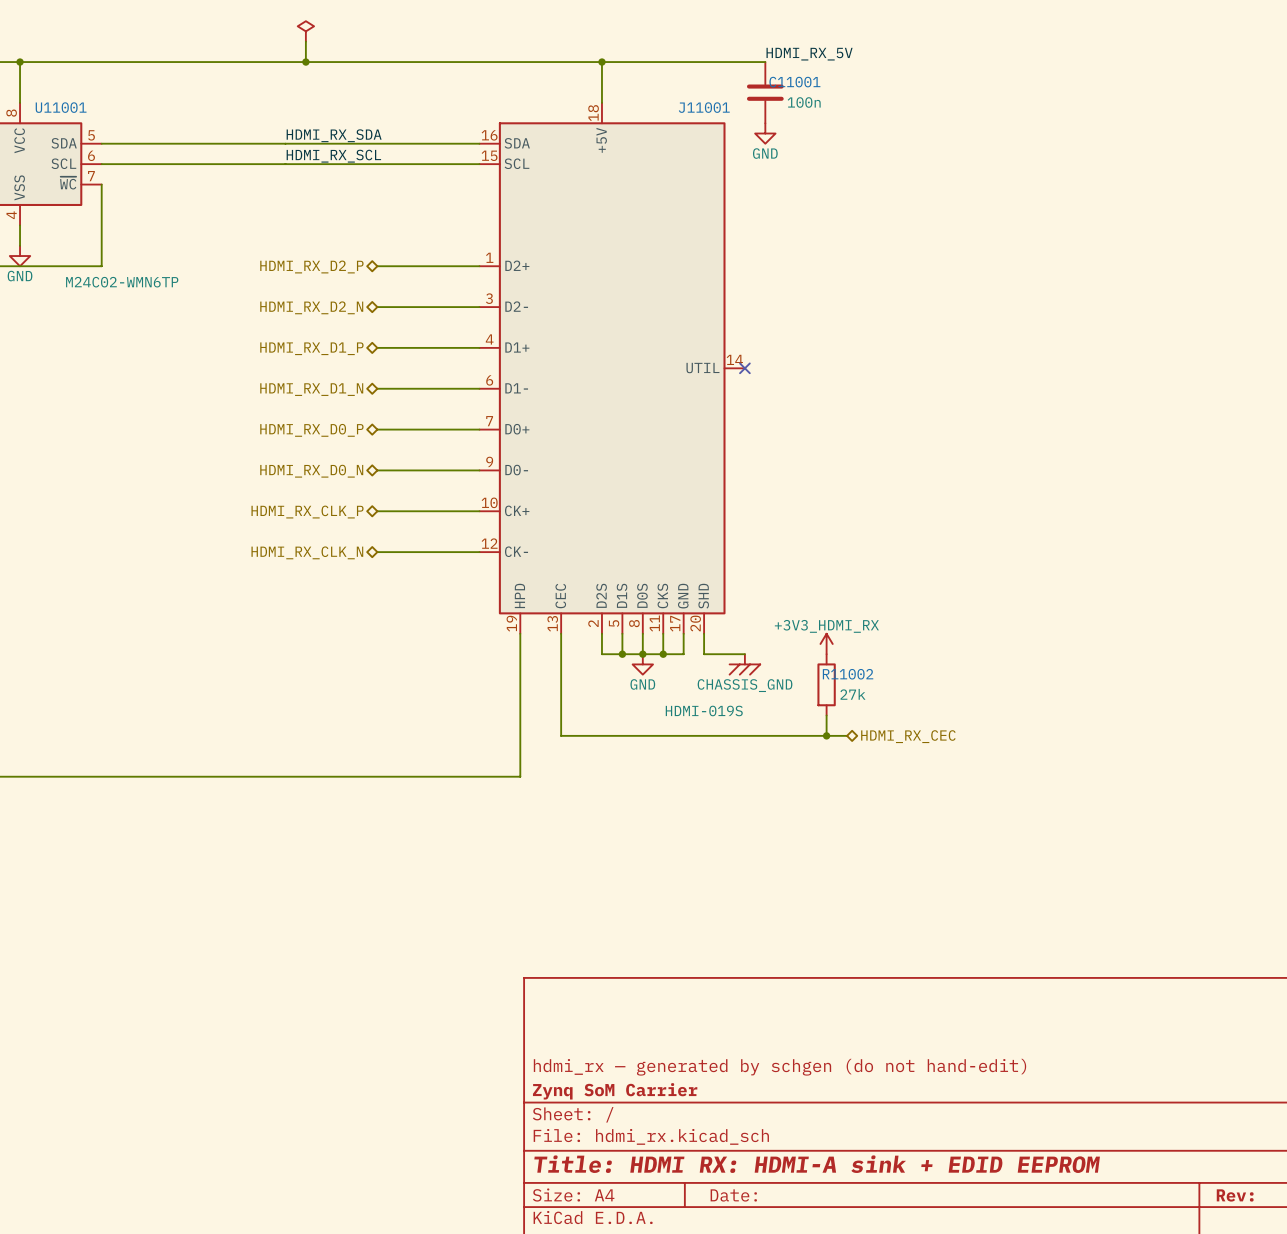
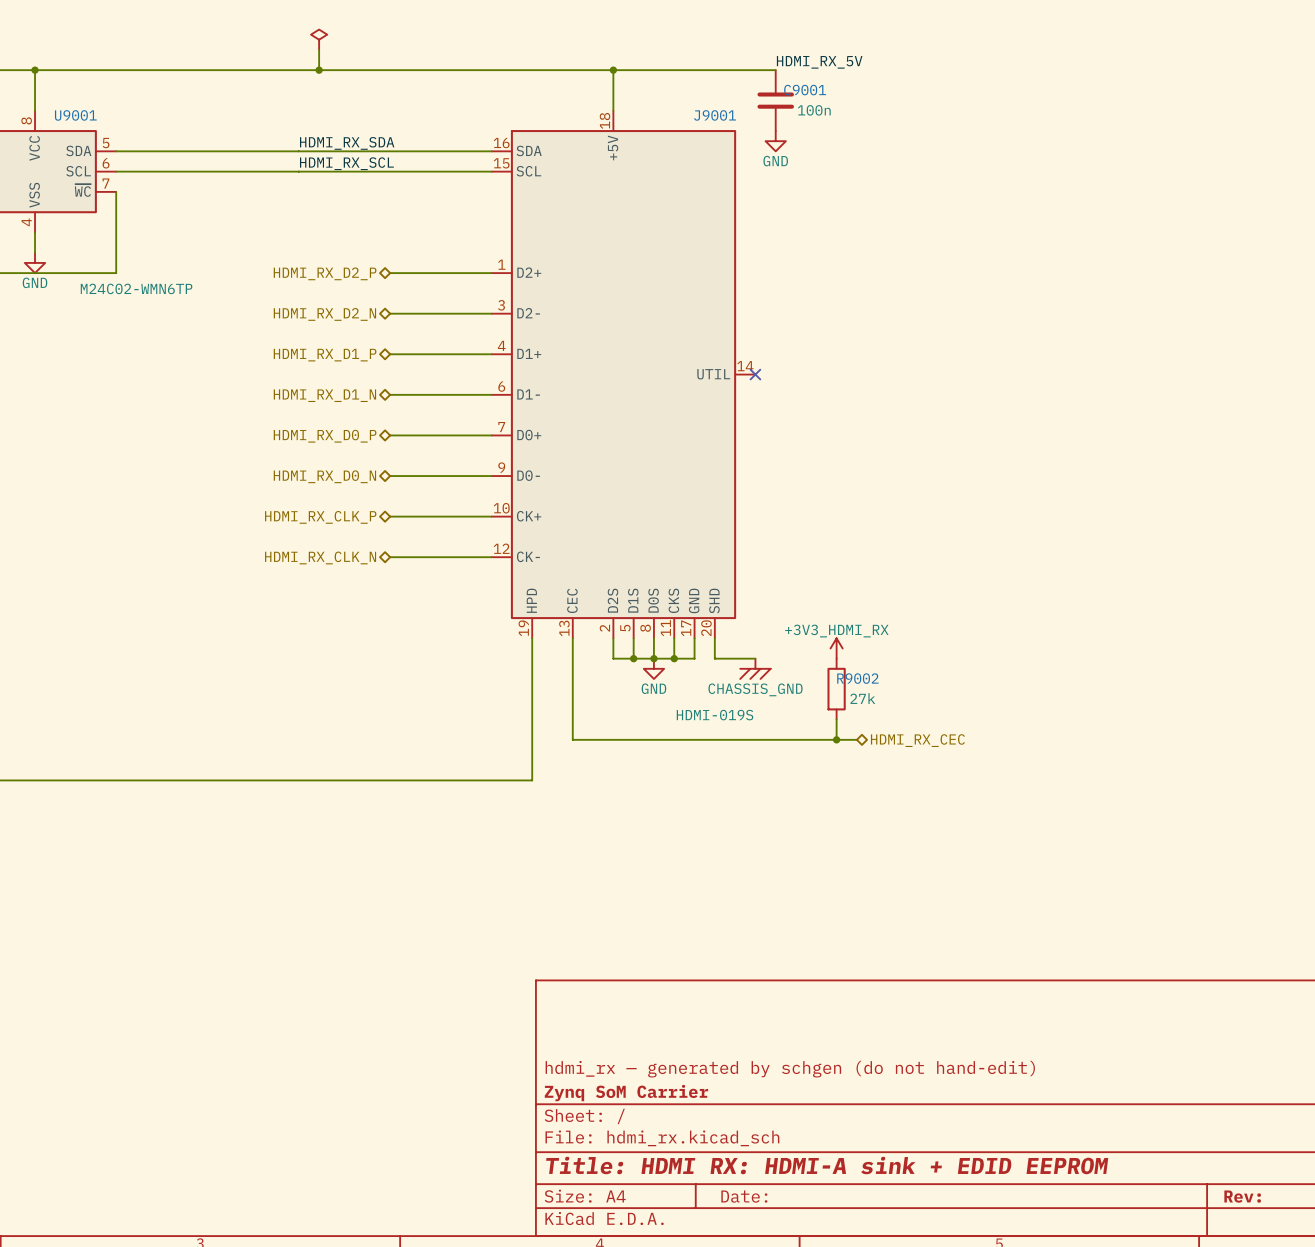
C11001 name: C11001 (794, 82) -> C9001 (805, 90)
U11001 name: U11001 (61, 107) -> U9001 (75, 115)
J11001 name: J11001 (704, 107) -> J9001 (715, 115)
R11002 name: R11002 (848, 674) -> R9002 (857, 678)

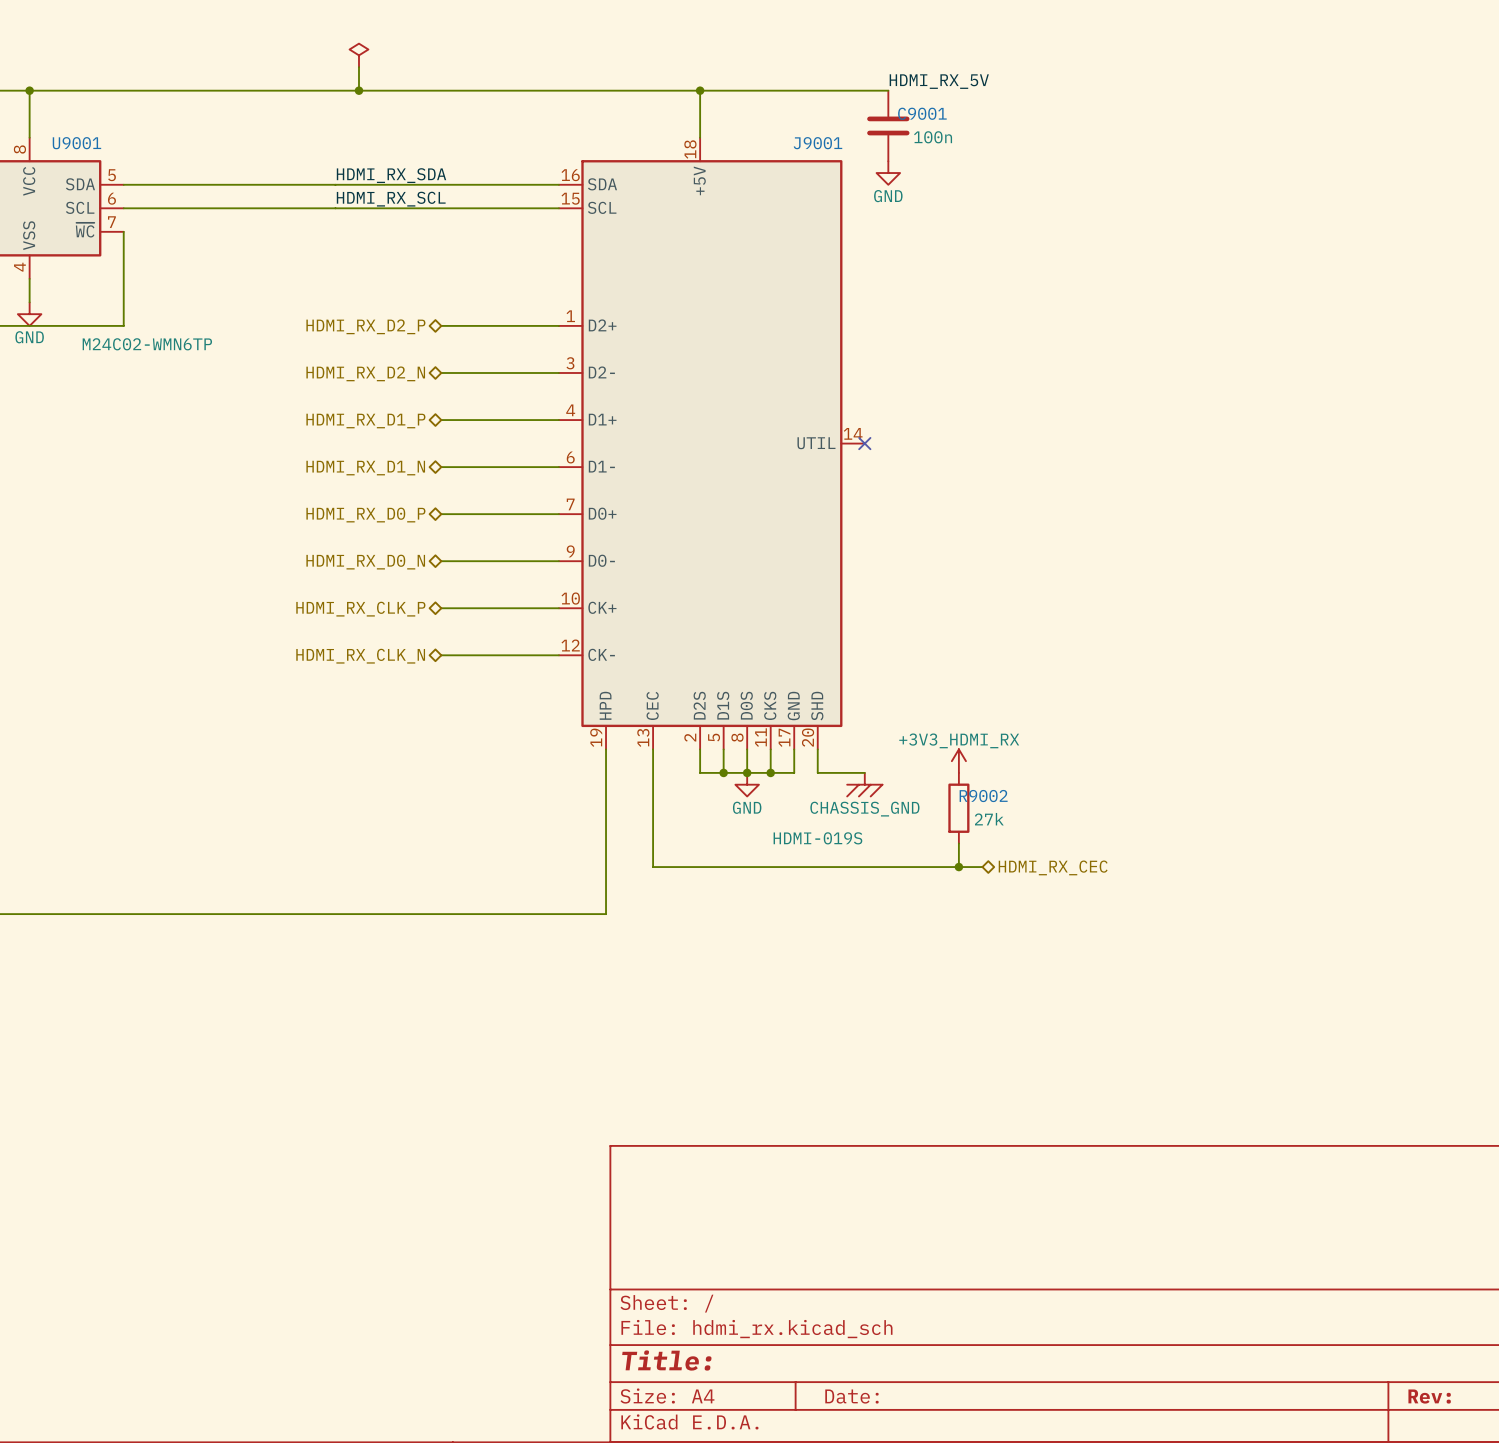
title block: hdmi_rx — generated by schgen (do not hand-edit) (790, 1069) -> none
title block: Zynq SoM Carrier (626, 1093) -> none
title block: Title: HDMI RX: HDMI-A sink + EDID EEPROM (827, 1165) -> Title: (666, 1360)

